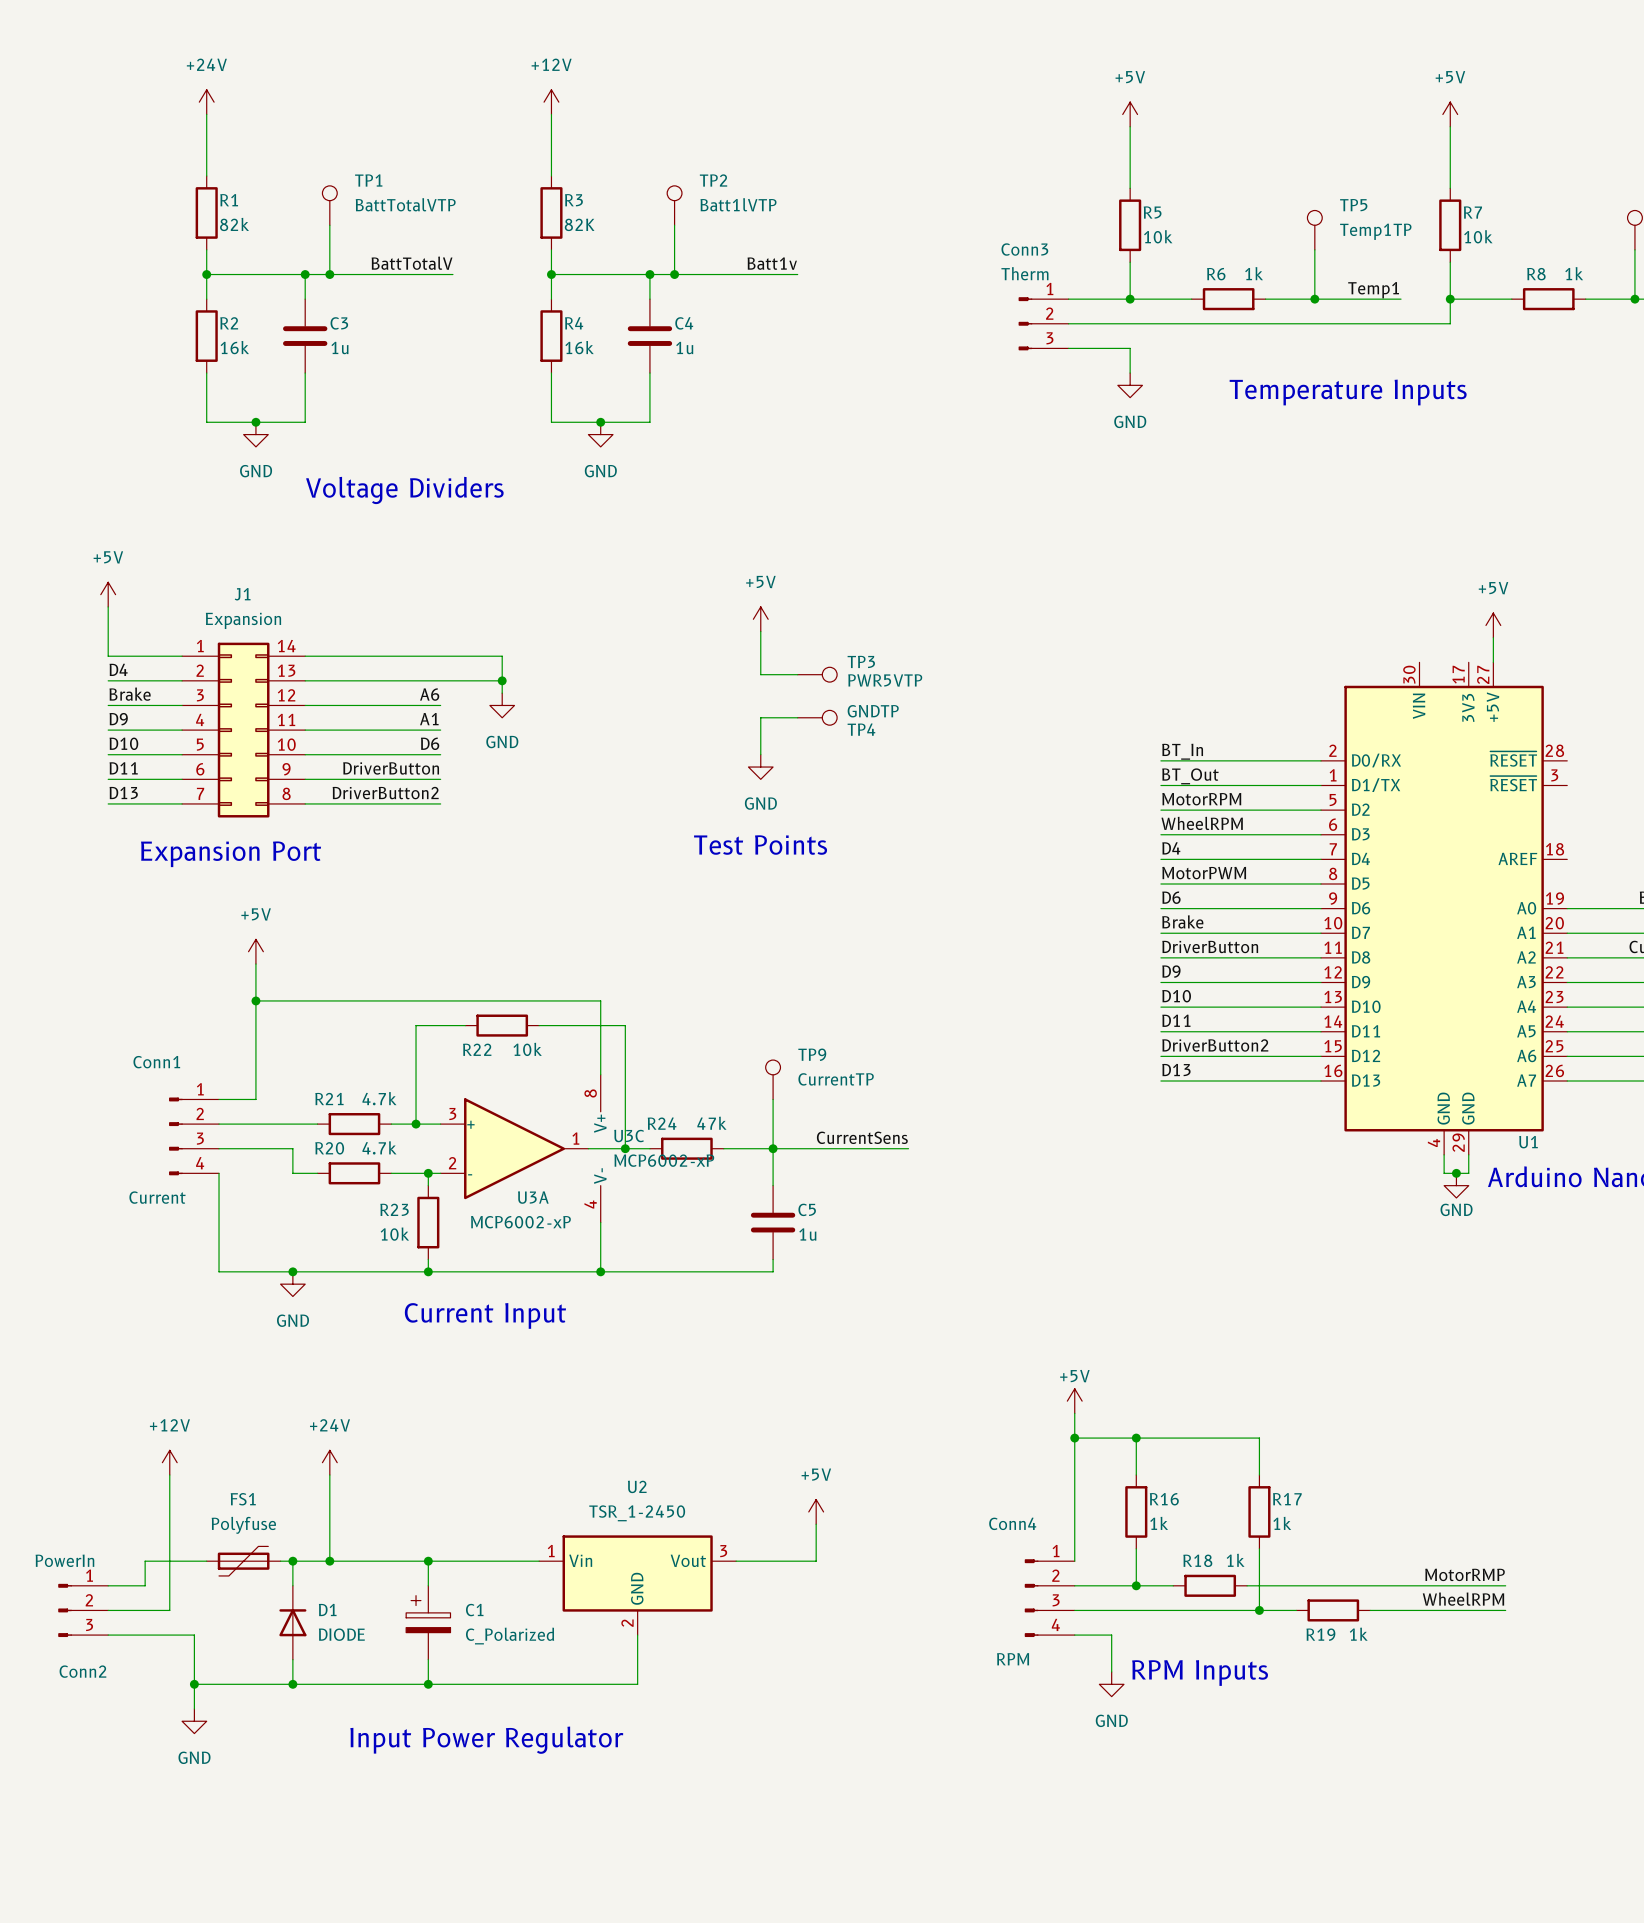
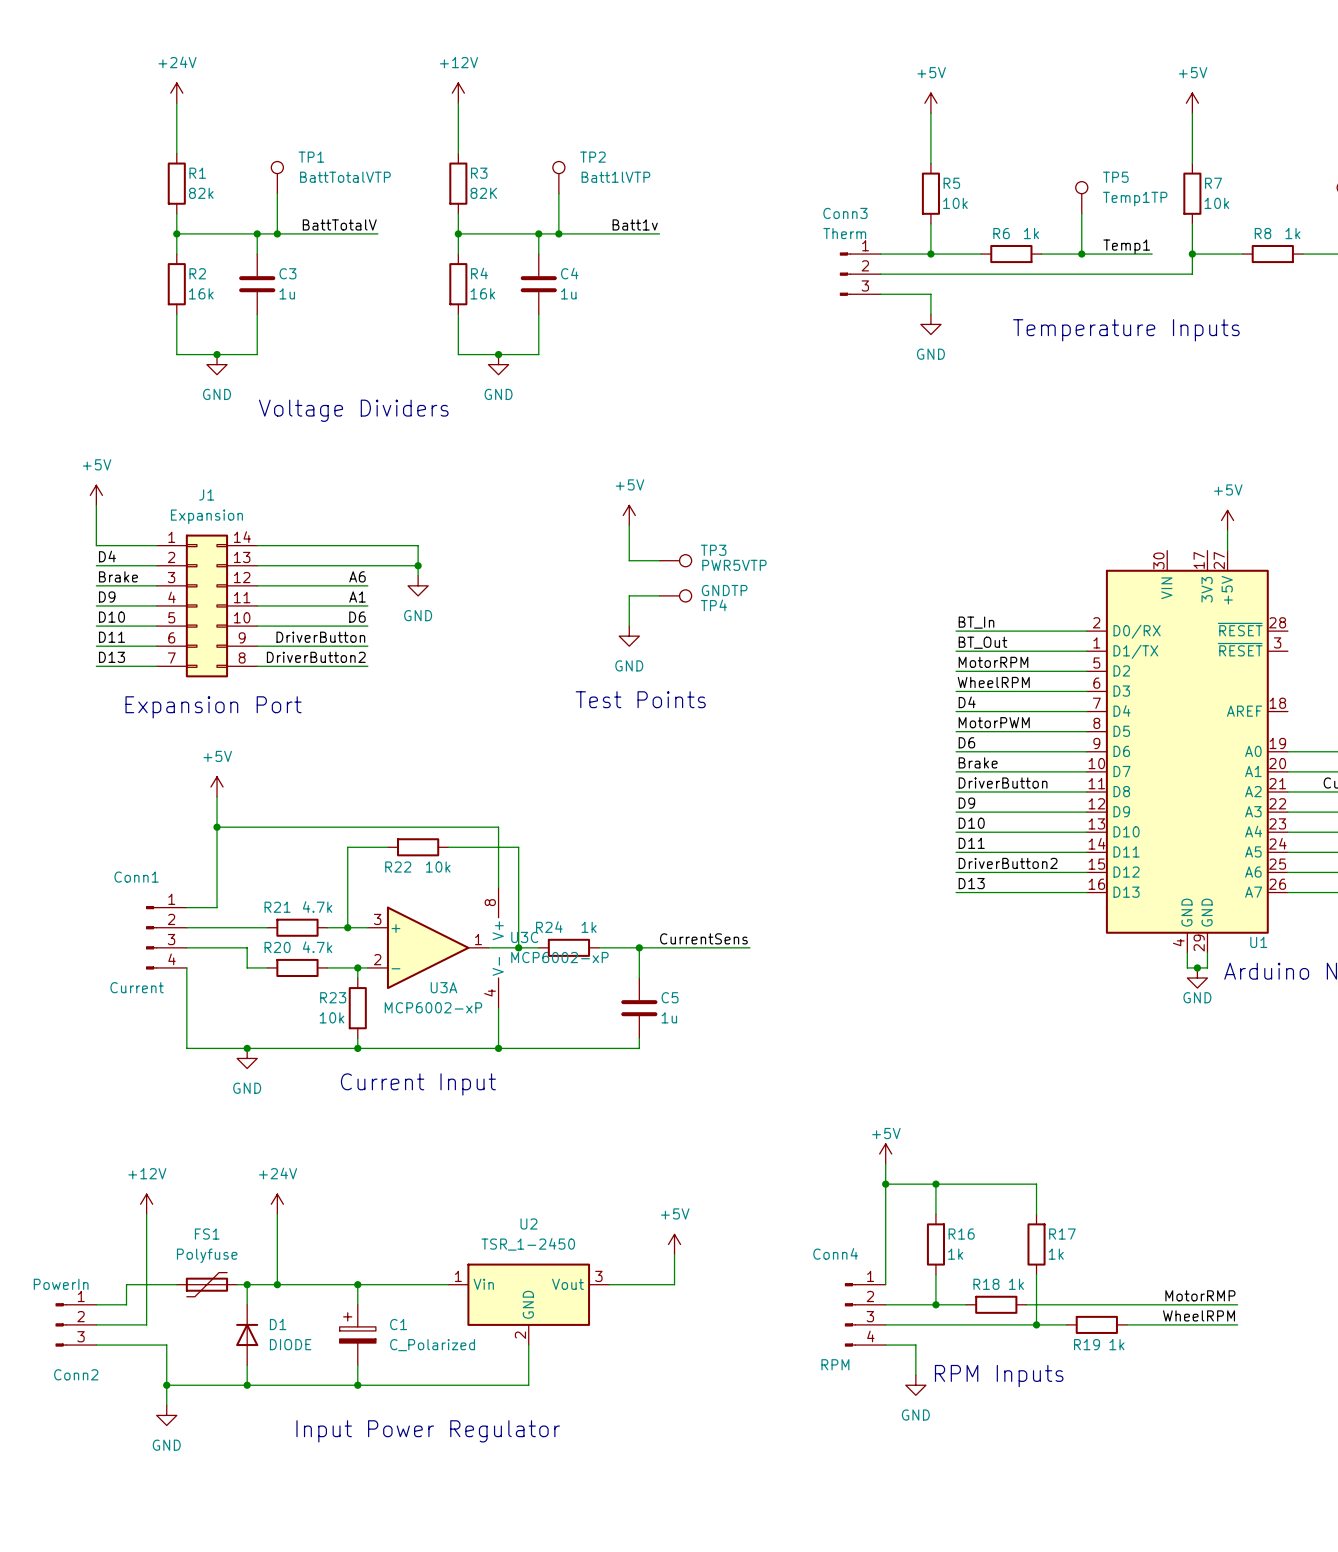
TP9: CurrentTP (773, 1079) -> none
wire: (773, 1099) (773, 1148) -> none
R24 value: 47k (711, 1123) -> 1k (589, 927)

